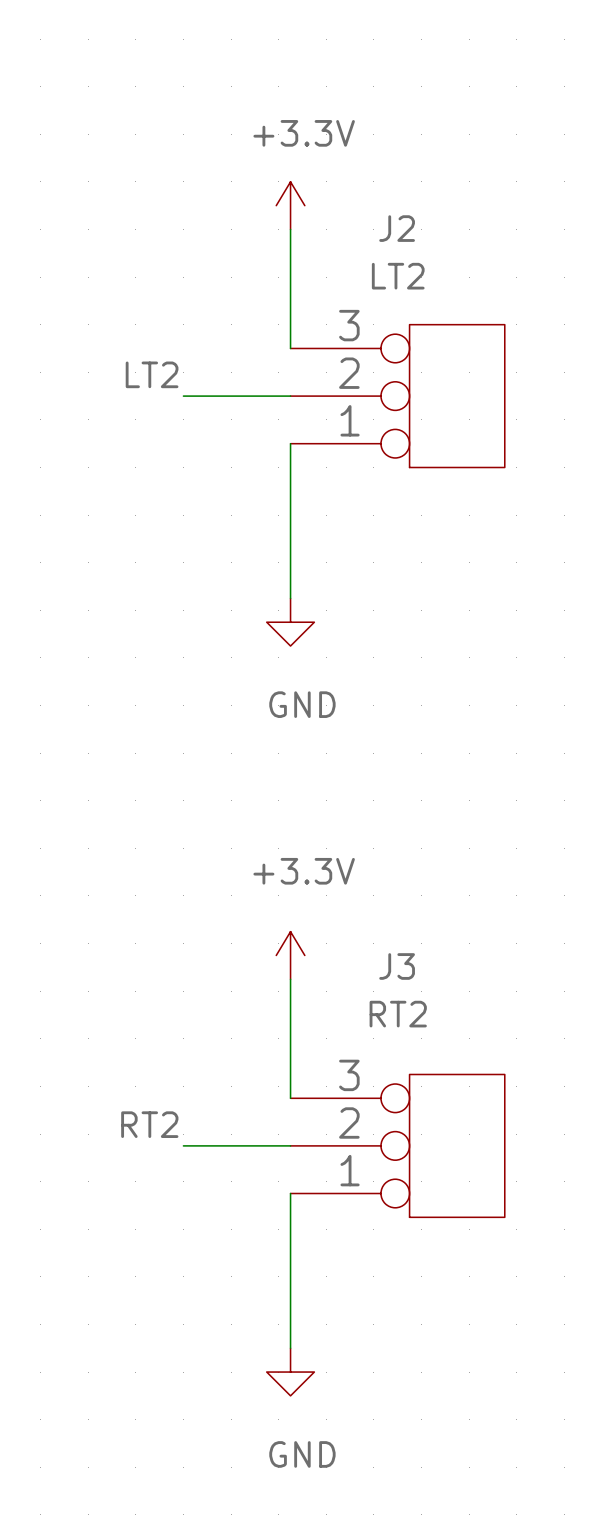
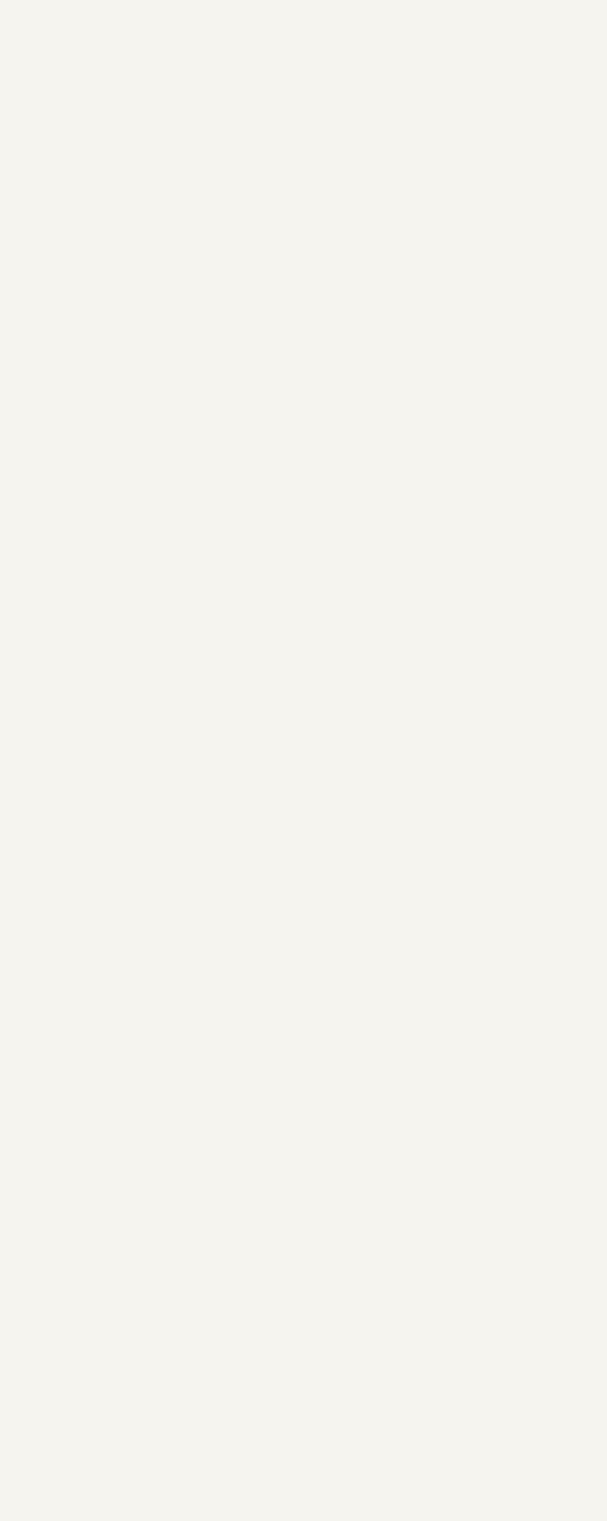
power symbol: +3.3V (290, 205) -> none
wire: (290, 229) (290, 348) -> none
label: LT2 (152, 374) -> none
wire: (183, 396) (290, 396) -> none
J2: LT2 (397, 396) -> none
wire: (290, 443) (290, 598) -> none
power symbol: GND (290, 622) -> none
power symbol: +3.3V (290, 955) -> none
wire: (290, 979) (290, 1098) -> none
label: RT2 (149, 1124) -> none
wire: (183, 1145) (290, 1145) -> none
J3: RT2 (397, 1145) -> none
wire: (290, 1193) (290, 1348) -> none
power symbol: GND (290, 1372) -> none

